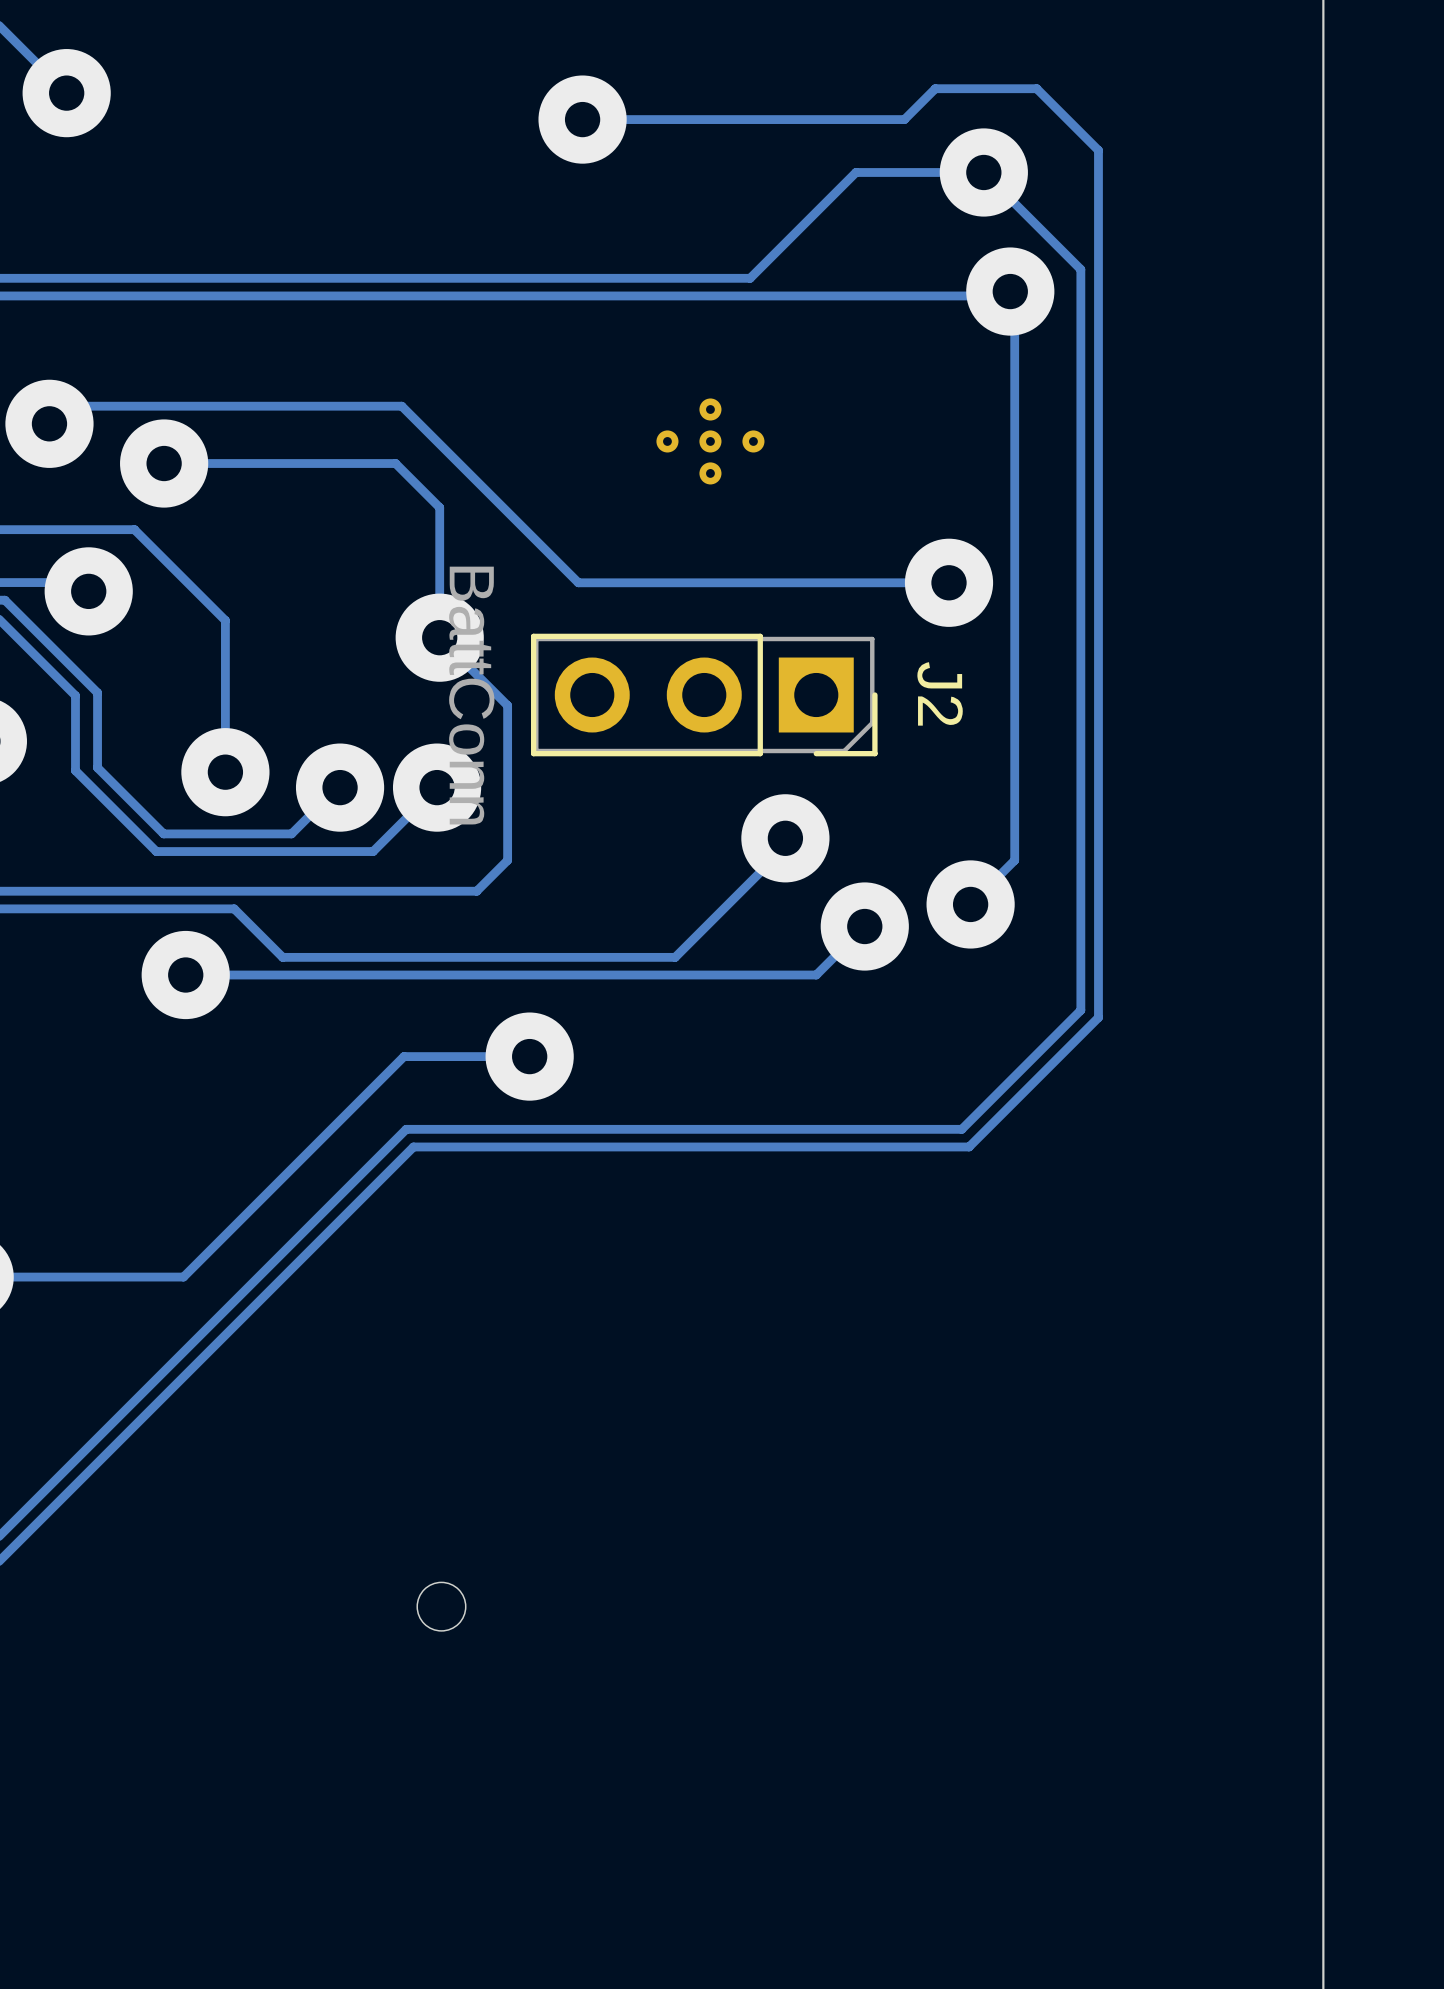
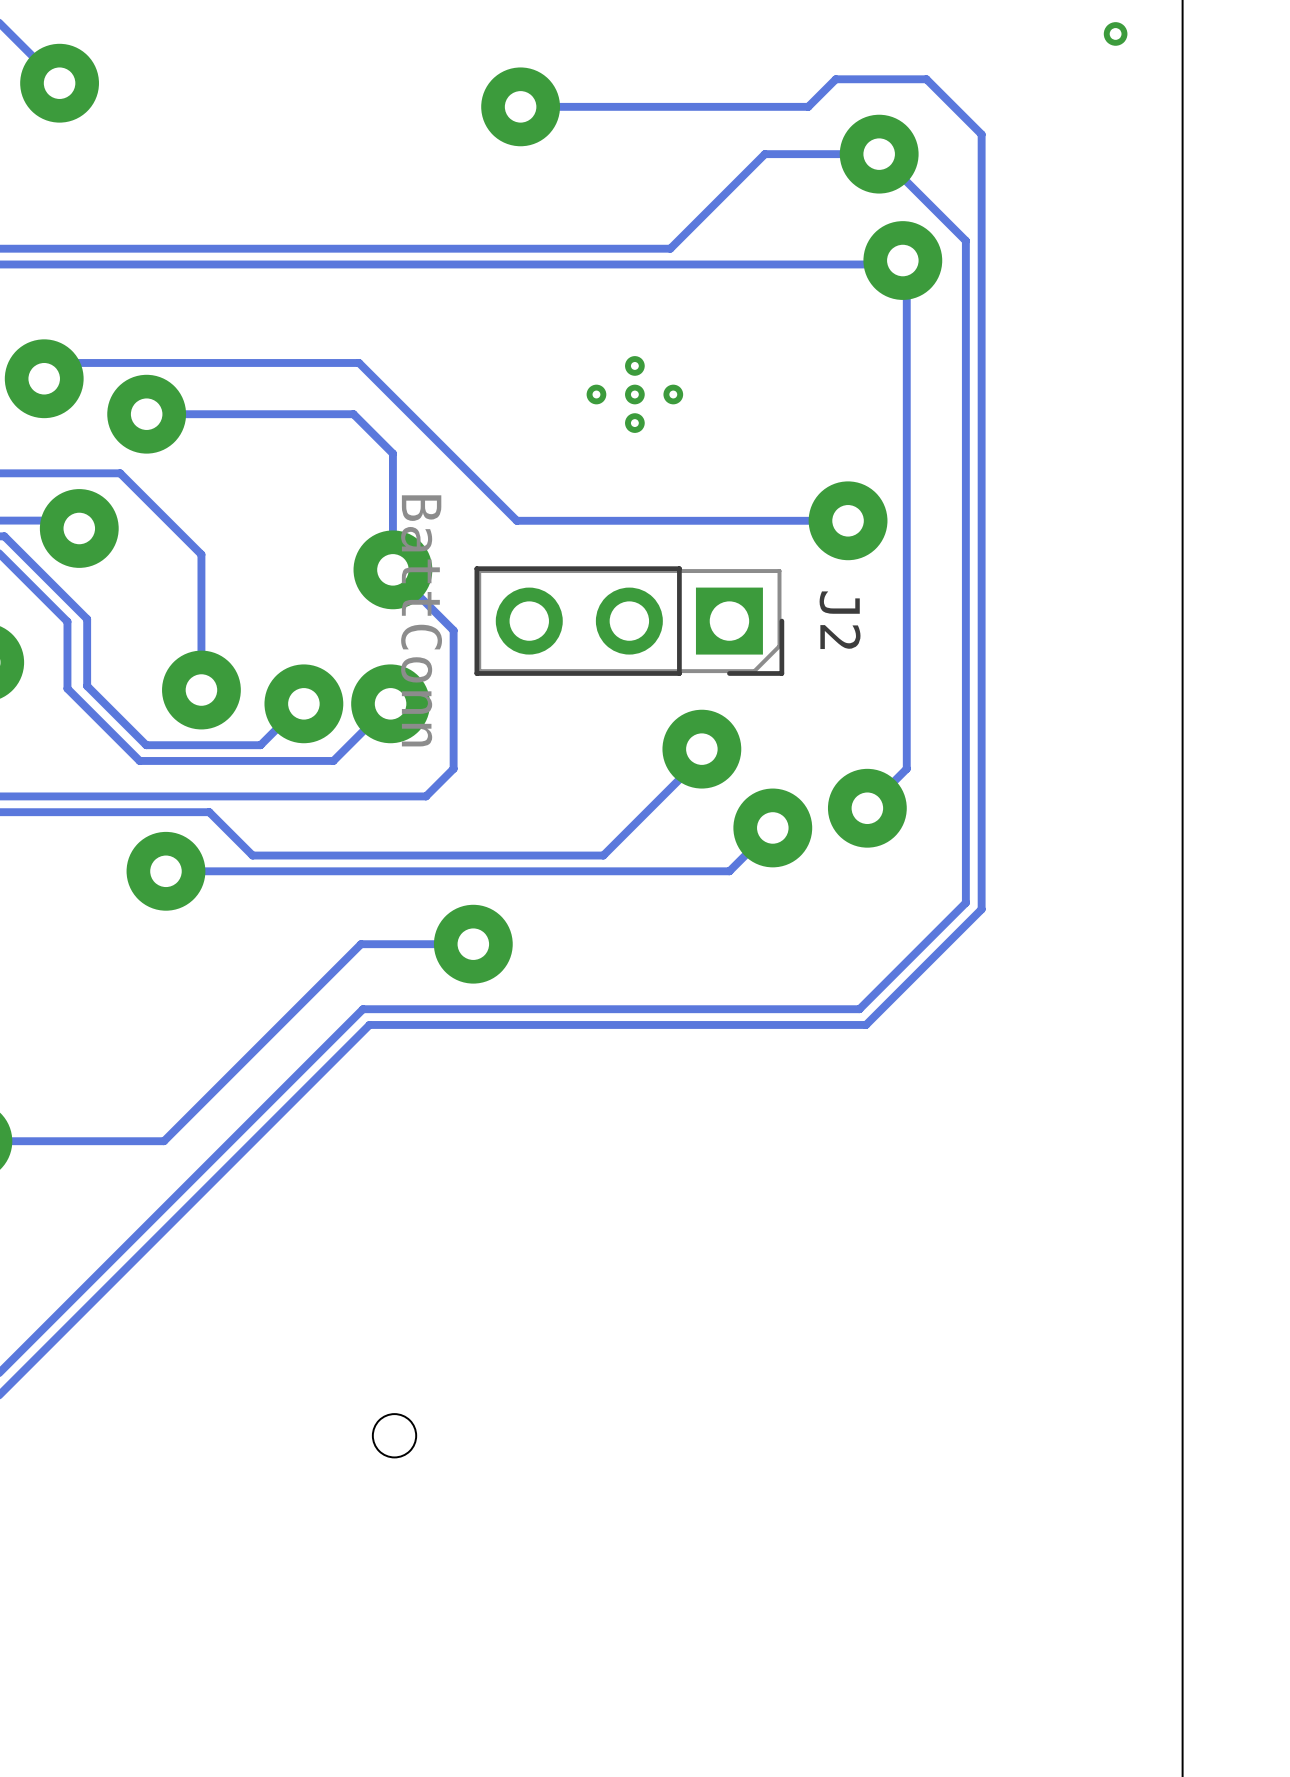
via: none -> (1115, 33)

